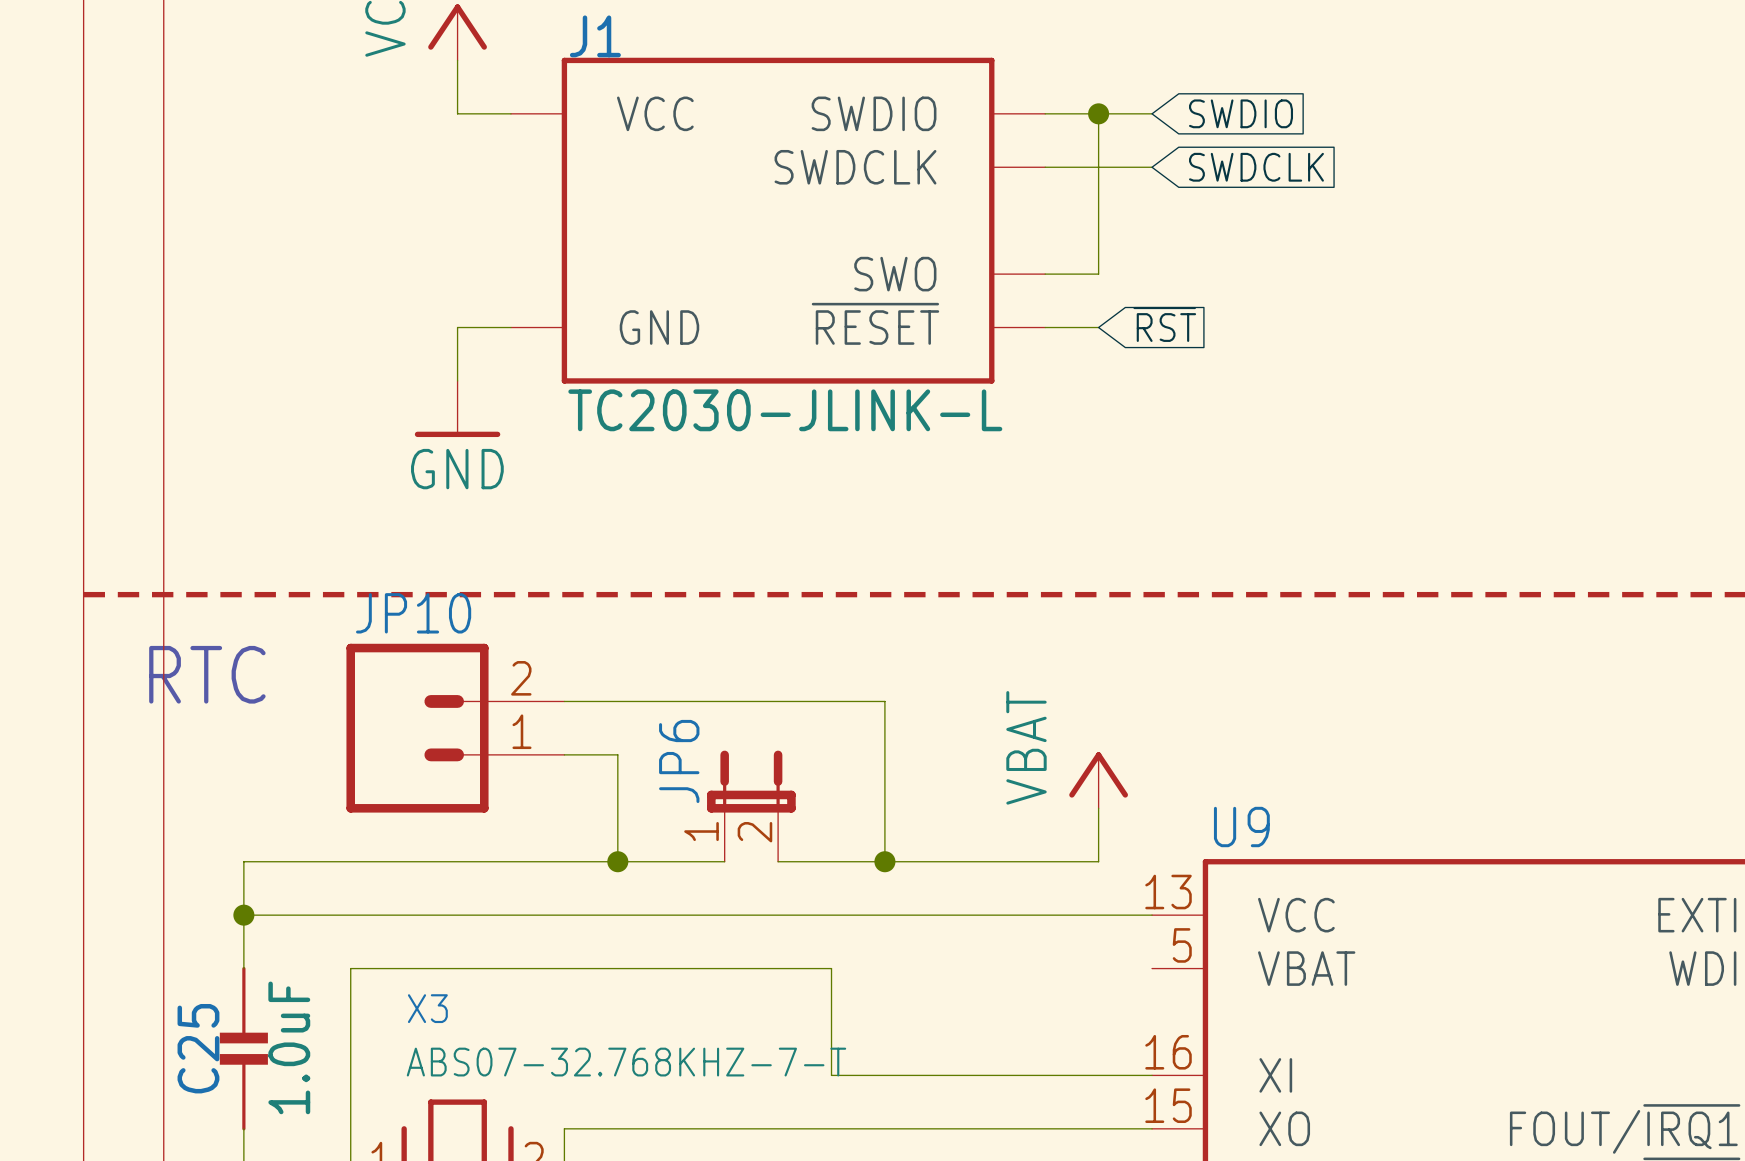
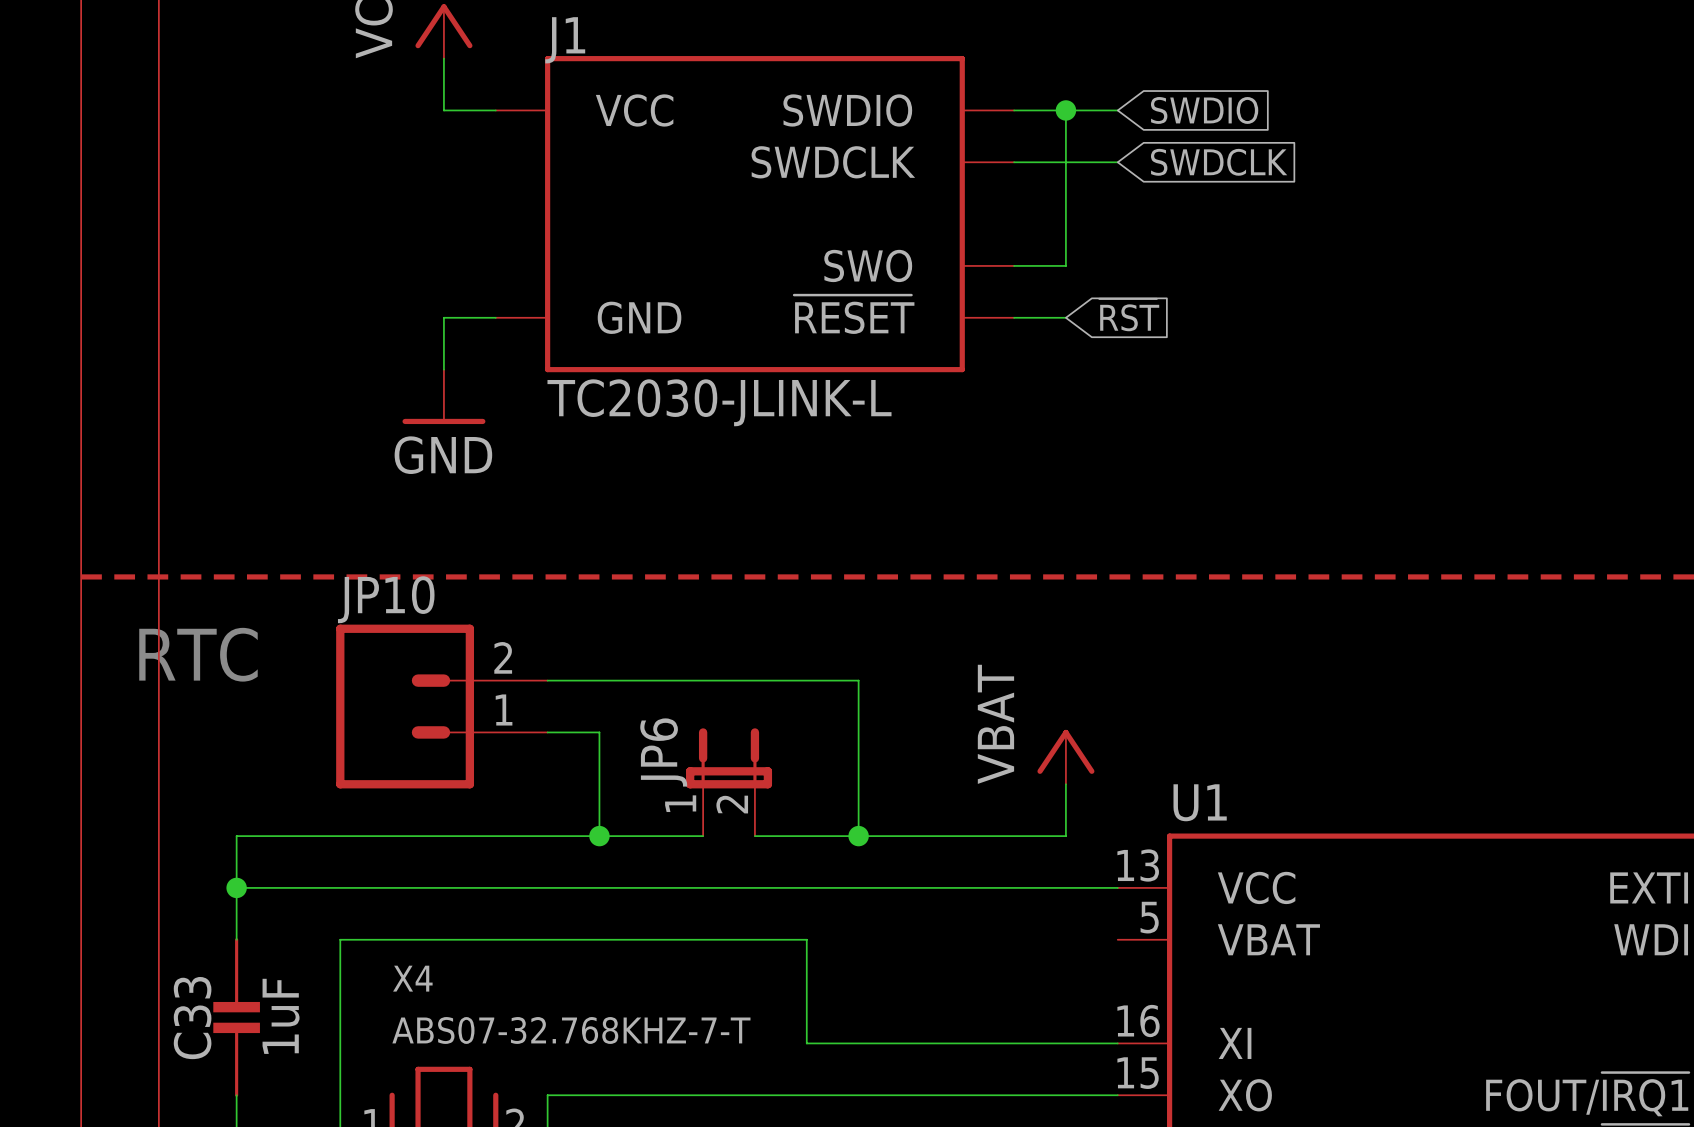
U9 name: U9 (1241, 827) -> U1 (1200, 802)
X3 name: X3 (427, 1008) -> X4 (412, 978)
C25 value: 1.0uF (289, 1047) -> 1uF (281, 1016)
C25 name: C25 (198, 1048) -> C33 (192, 1018)

